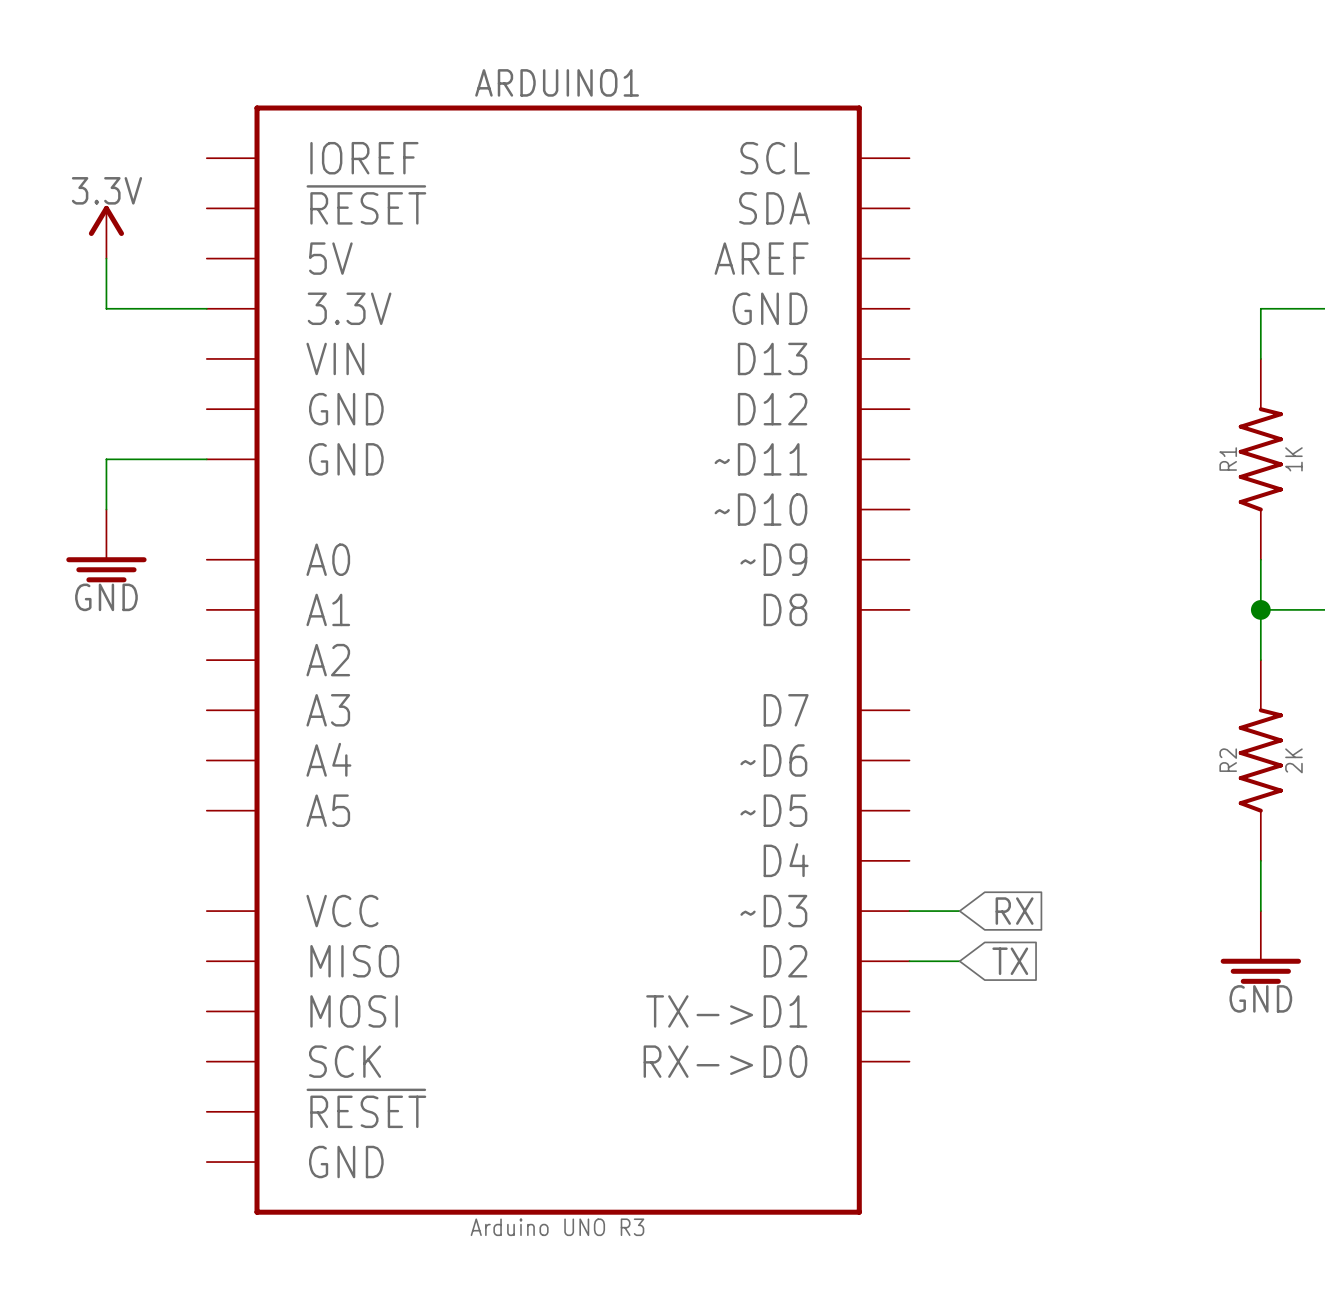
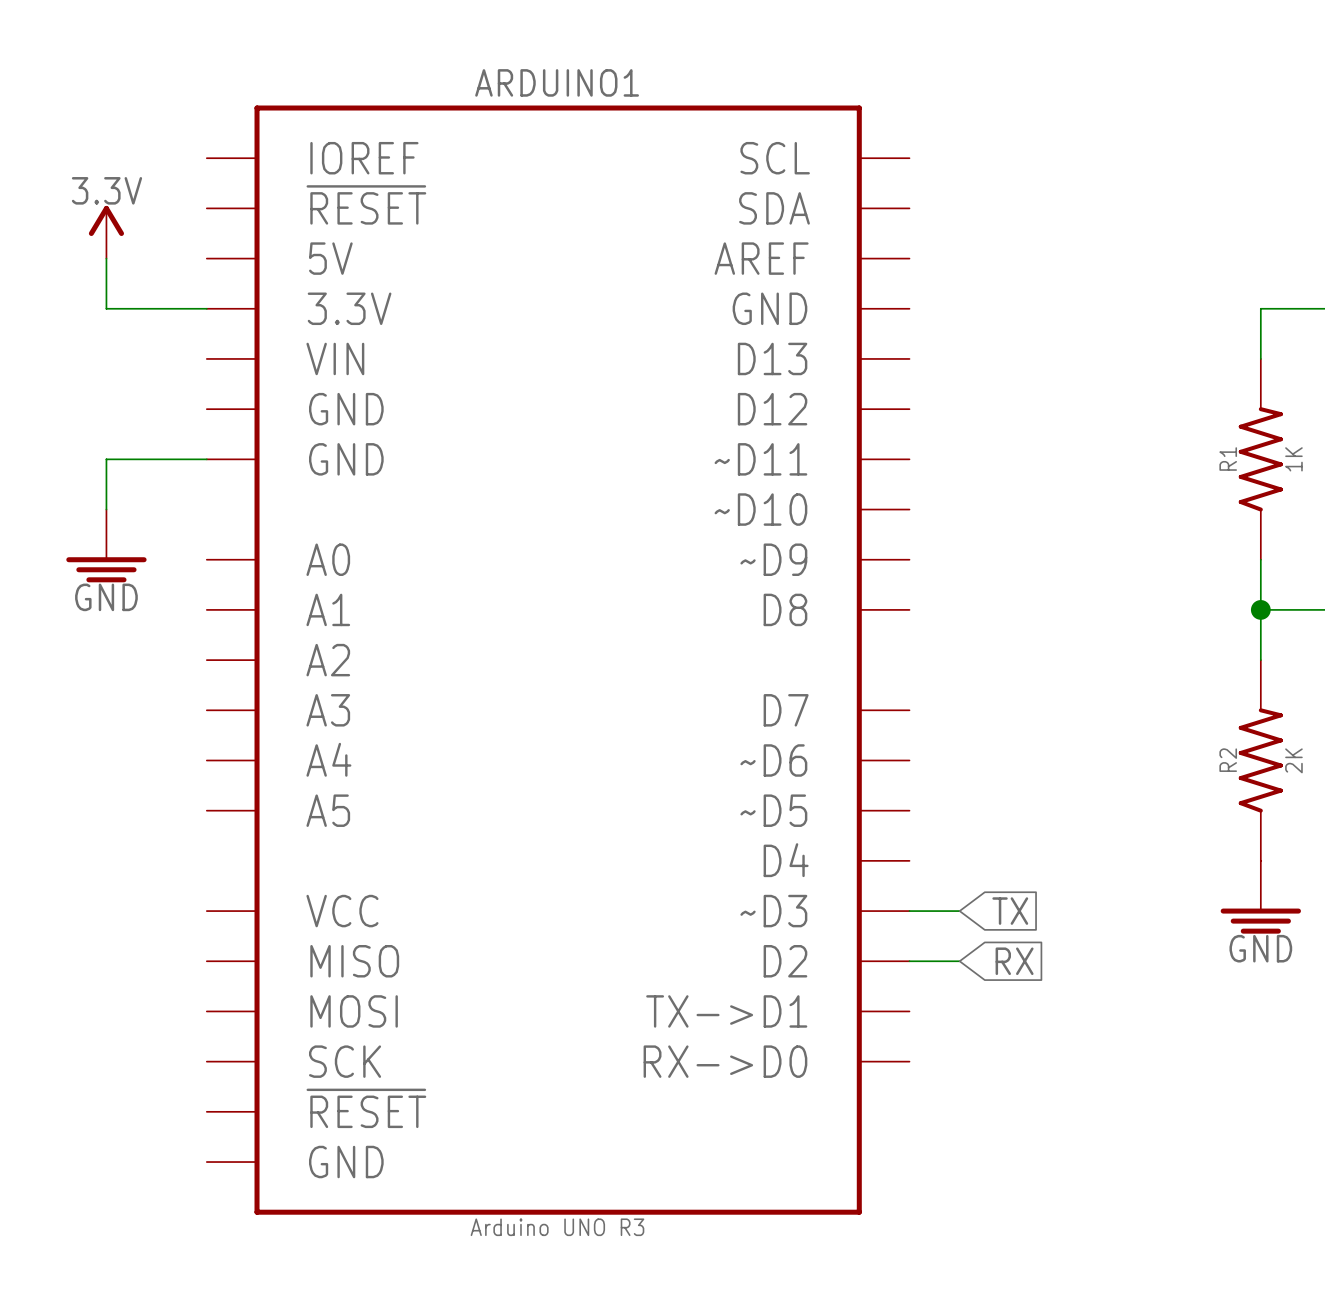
global label: RX (1014, 911) -> TX (1010, 911)
power symbol position: (1260, 947) -> (1260, 897)
global label: TX (1010, 961) -> RX (1014, 961)

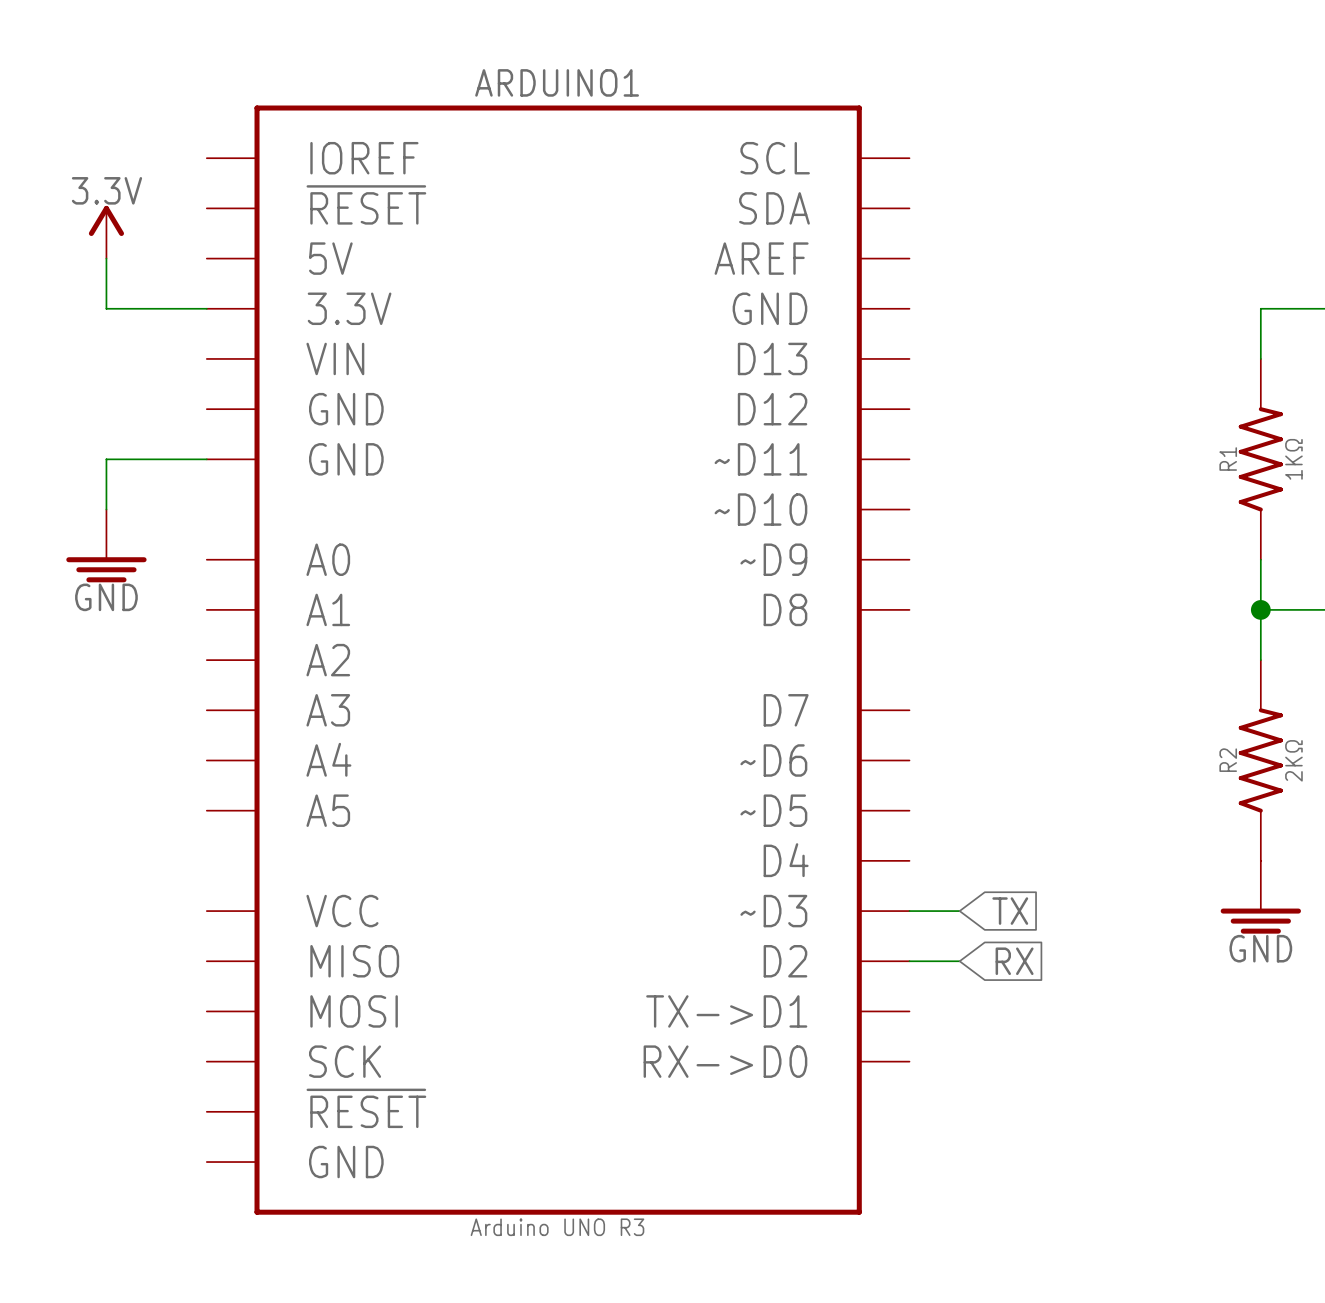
R1 value: 1K (1293, 459) -> 1KΩ (1293, 459)
R2 value: 2K (1293, 760) -> 2KΩ (1293, 760)

